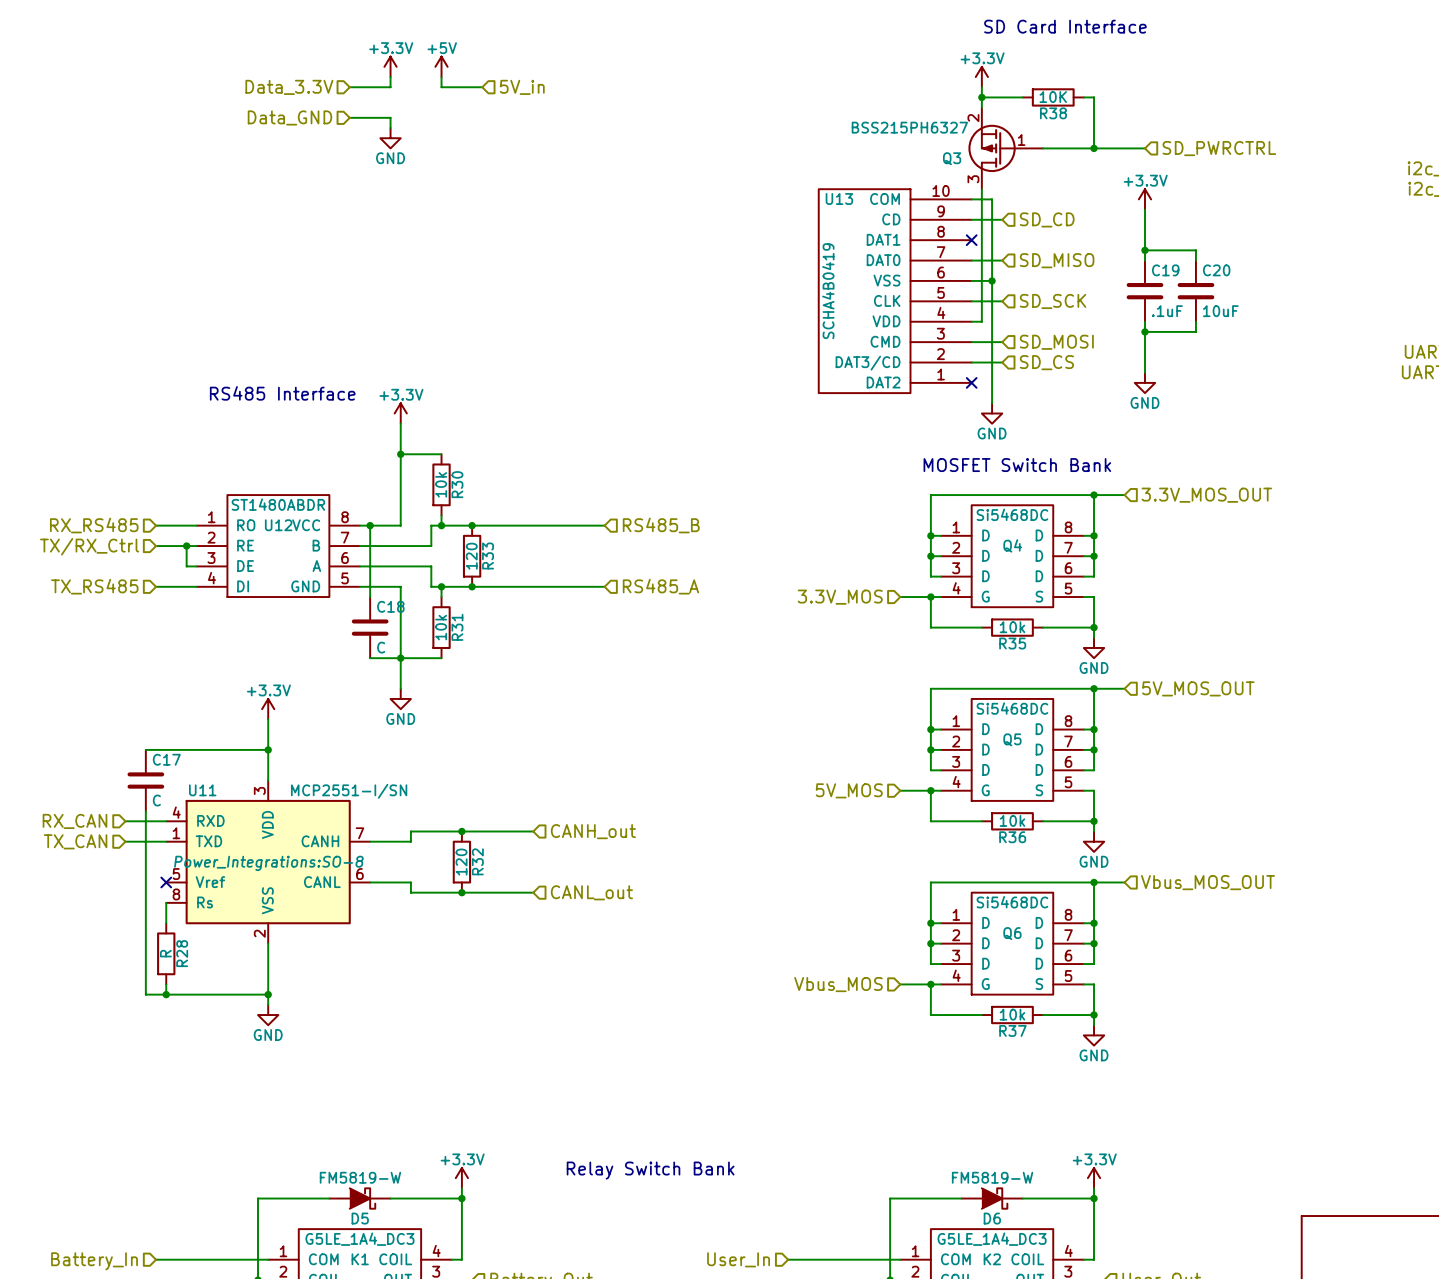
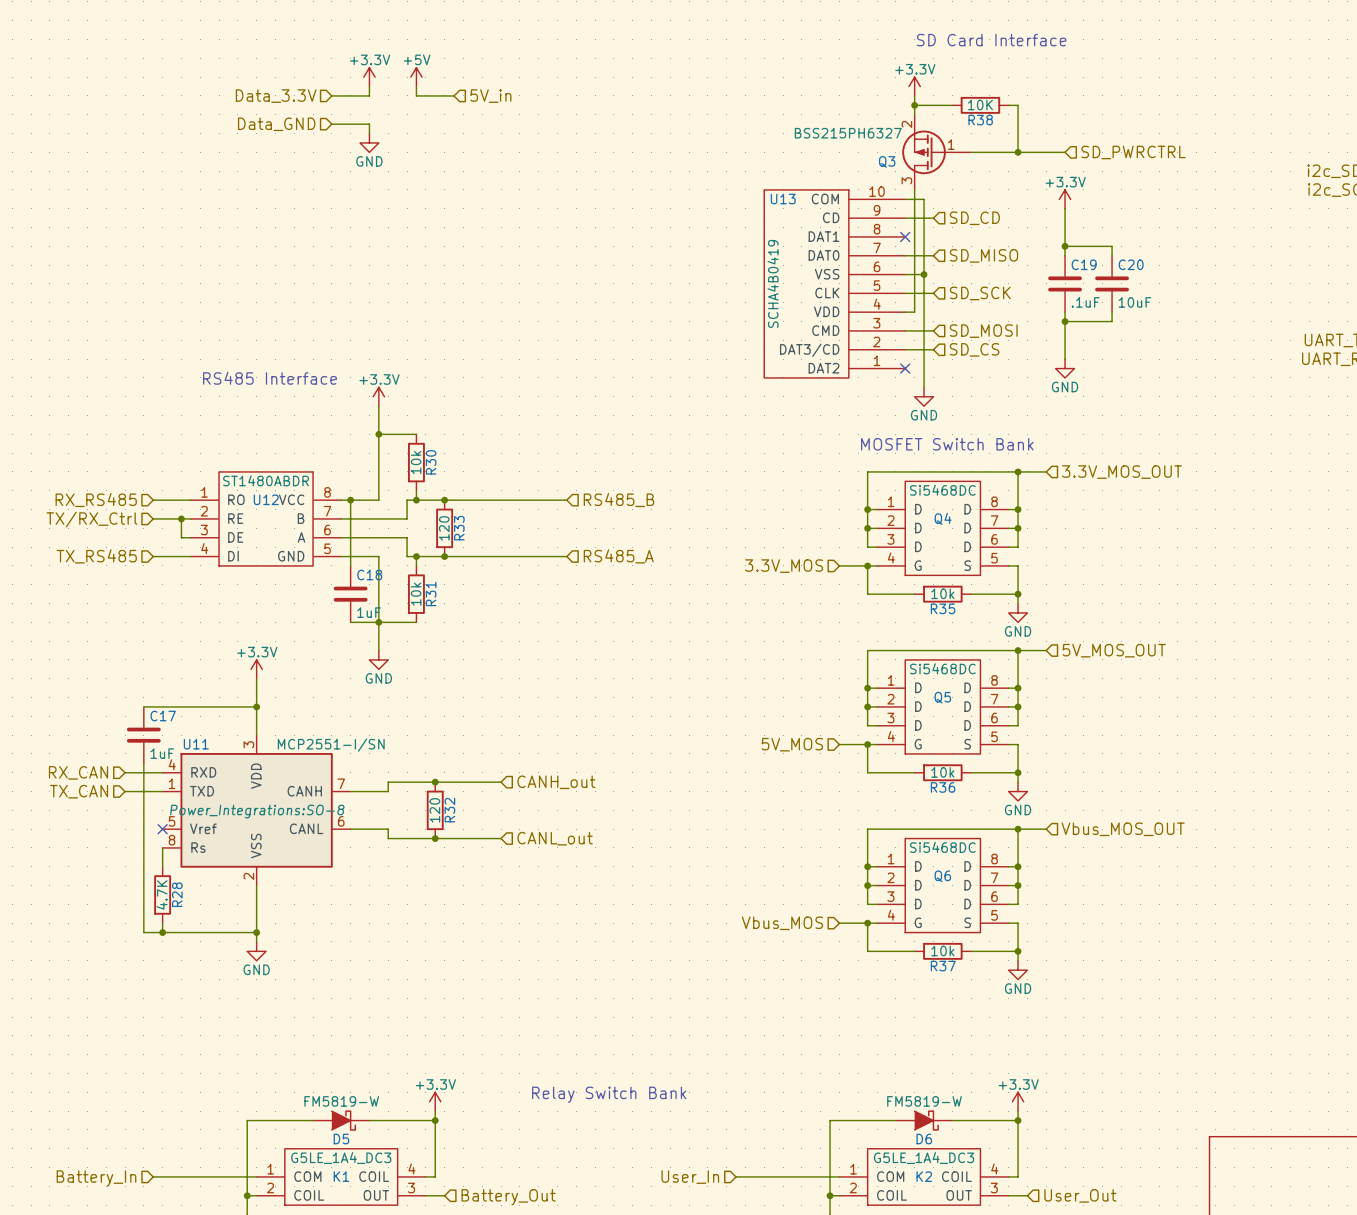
C18 value: C (381, 647) -> 1uF (369, 612)
C17 value: C (156, 800) -> 1uF (162, 753)
R28 value: R (165, 953) -> 4.7K (162, 894)

